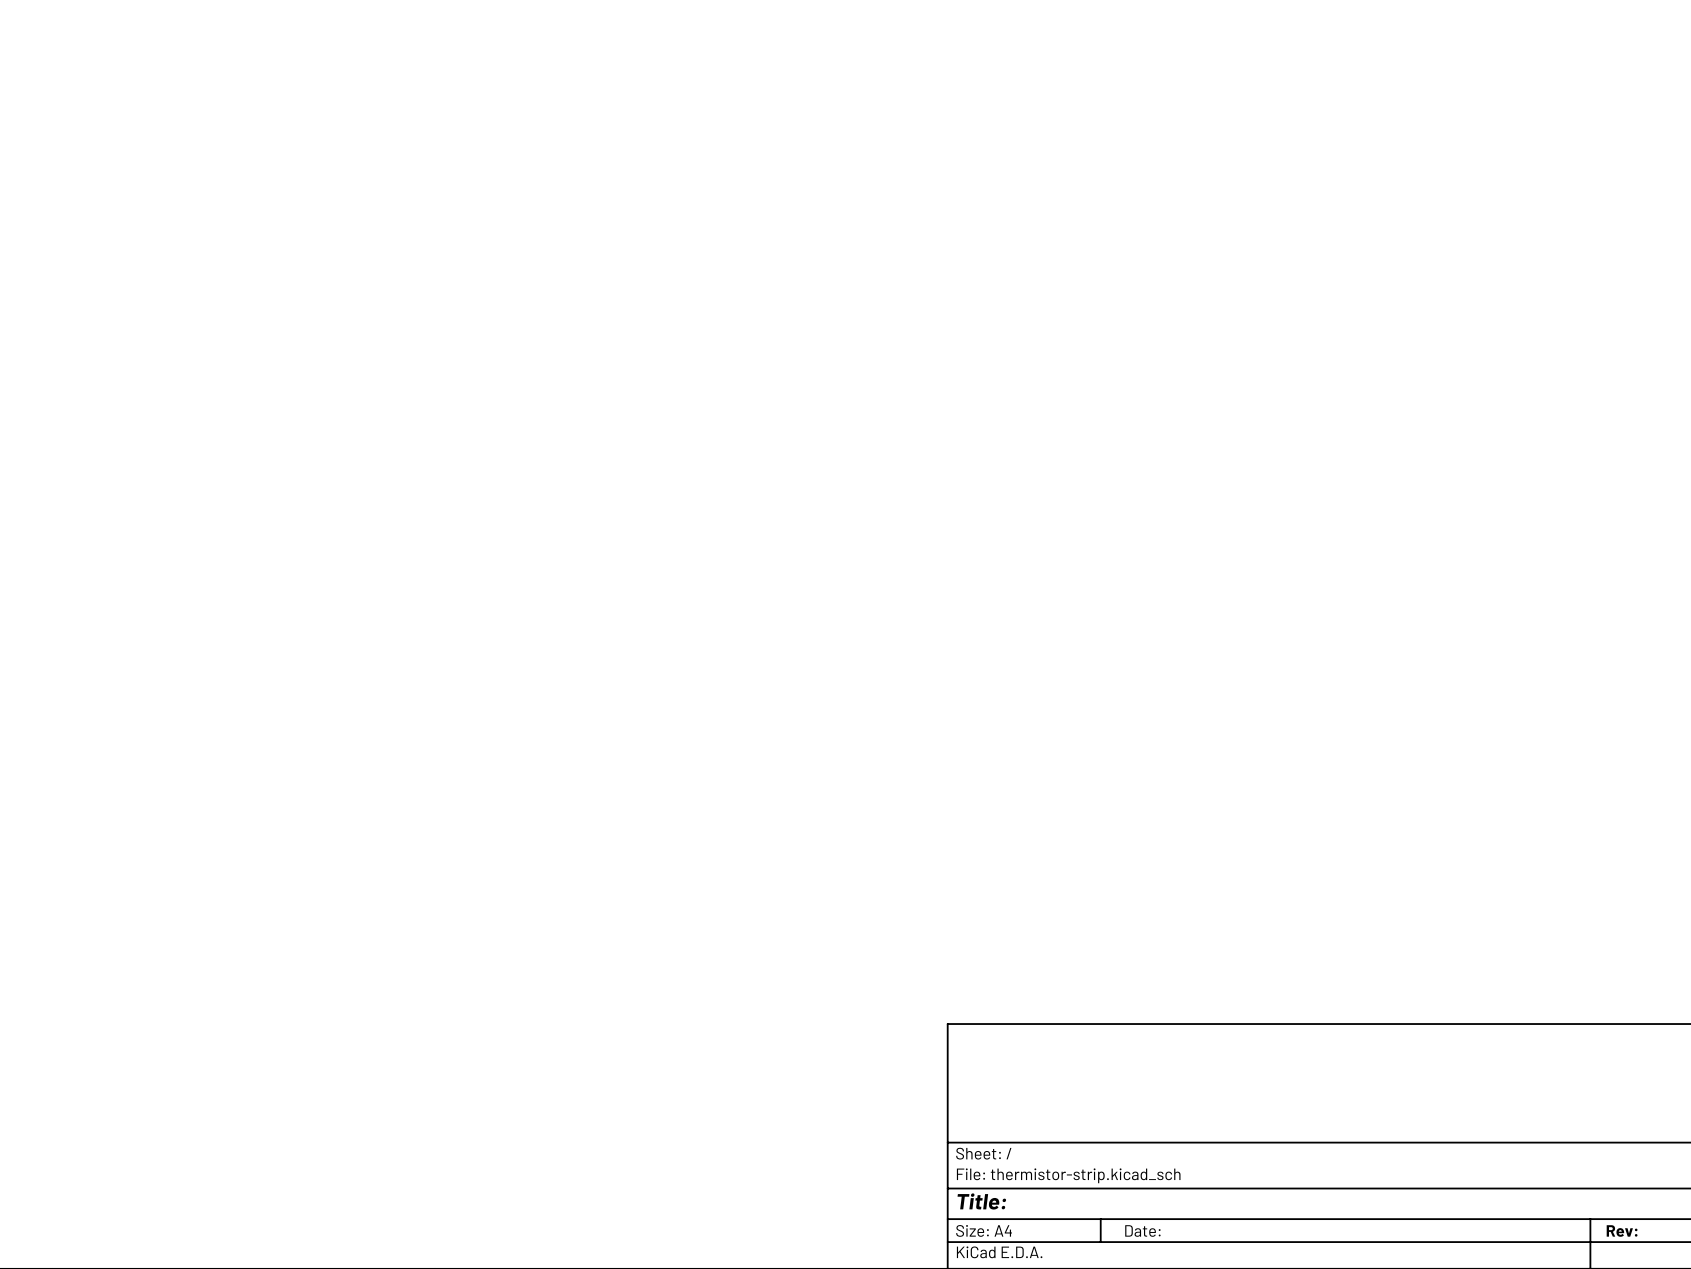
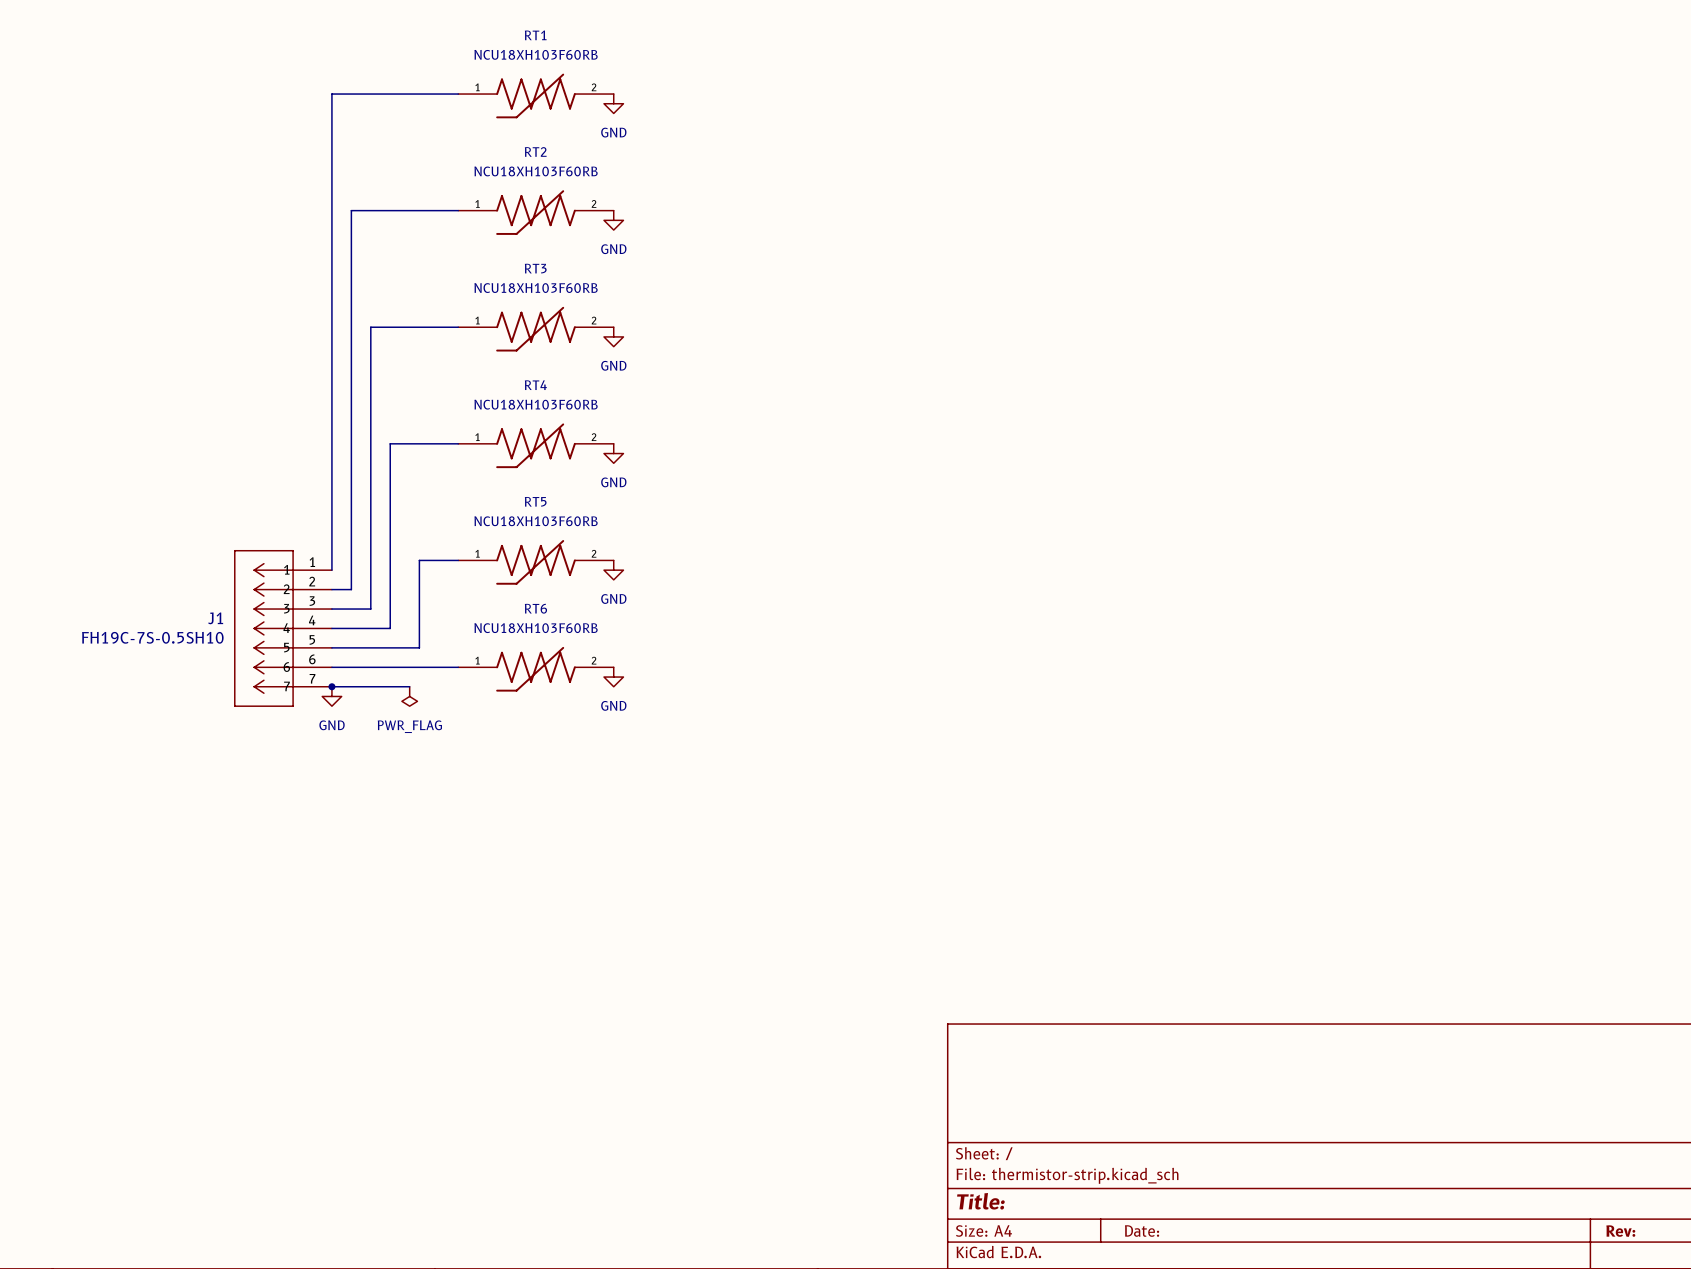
wire: none -> (458, 94) (331, 94) (331, 570)
RT1: none -> NCU18XH103F60RB (536, 95)
power symbol: none -> GND (613, 103)
wire: none -> (458, 210) (351, 210) (351, 589) (331, 589)
RT2: none -> NCU18XH103F60RB (536, 212)
power symbol: none -> GND (613, 220)
wire: none -> (458, 327) (370, 327) (370, 609) (331, 609)
RT3: none -> NCU18XH103F60RB (536, 329)
power symbol: none -> GND (613, 336)
wire: none -> (458, 443) (390, 443) (390, 628) (331, 628)
RT4: none -> NCU18XH103F60RB (536, 445)
power symbol: none -> GND (613, 453)
wire: none -> (458, 560) (419, 560) (419, 647) (331, 647)
RT5: none -> NCU18XH103F60RB (536, 562)
power symbol: none -> GND (613, 570)
J1: none -> FH19C-7S-0.5SH10 (283, 628)
wire: none -> (331, 667) (458, 667)
RT6: none -> NCU18XH103F60RB (536, 669)
power symbol: none -> GND (613, 677)
wire: none -> (331, 686) (409, 686)
junction: none -> (331, 686)
power symbol: none -> GND (331, 696)
power symbol: none -> PWR_FLAG (409, 696)

